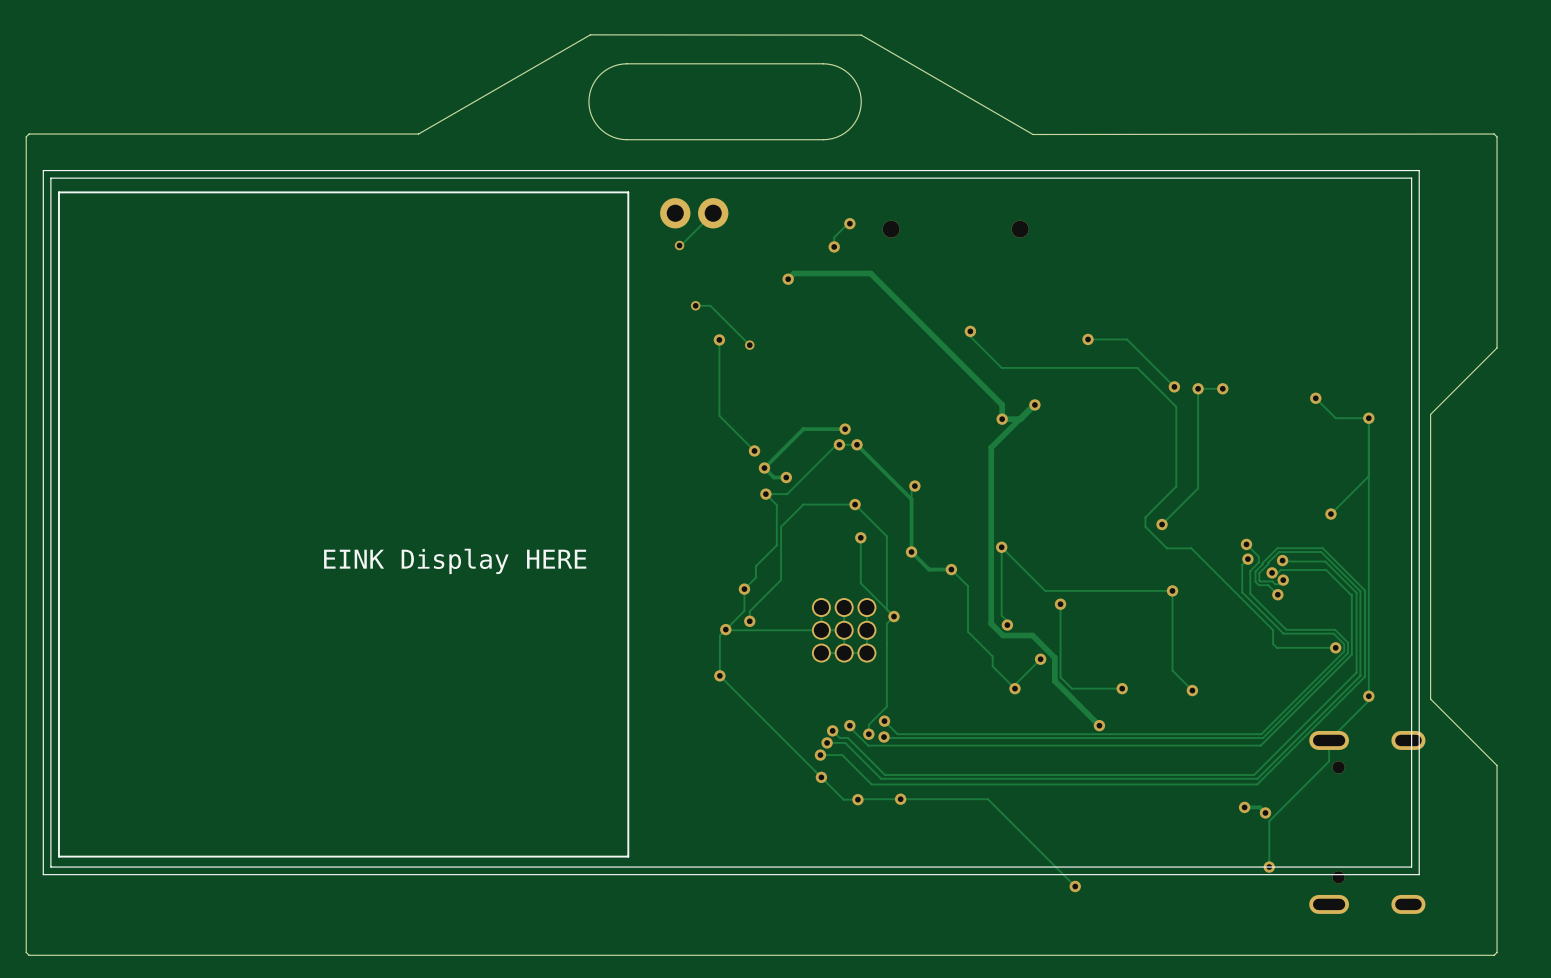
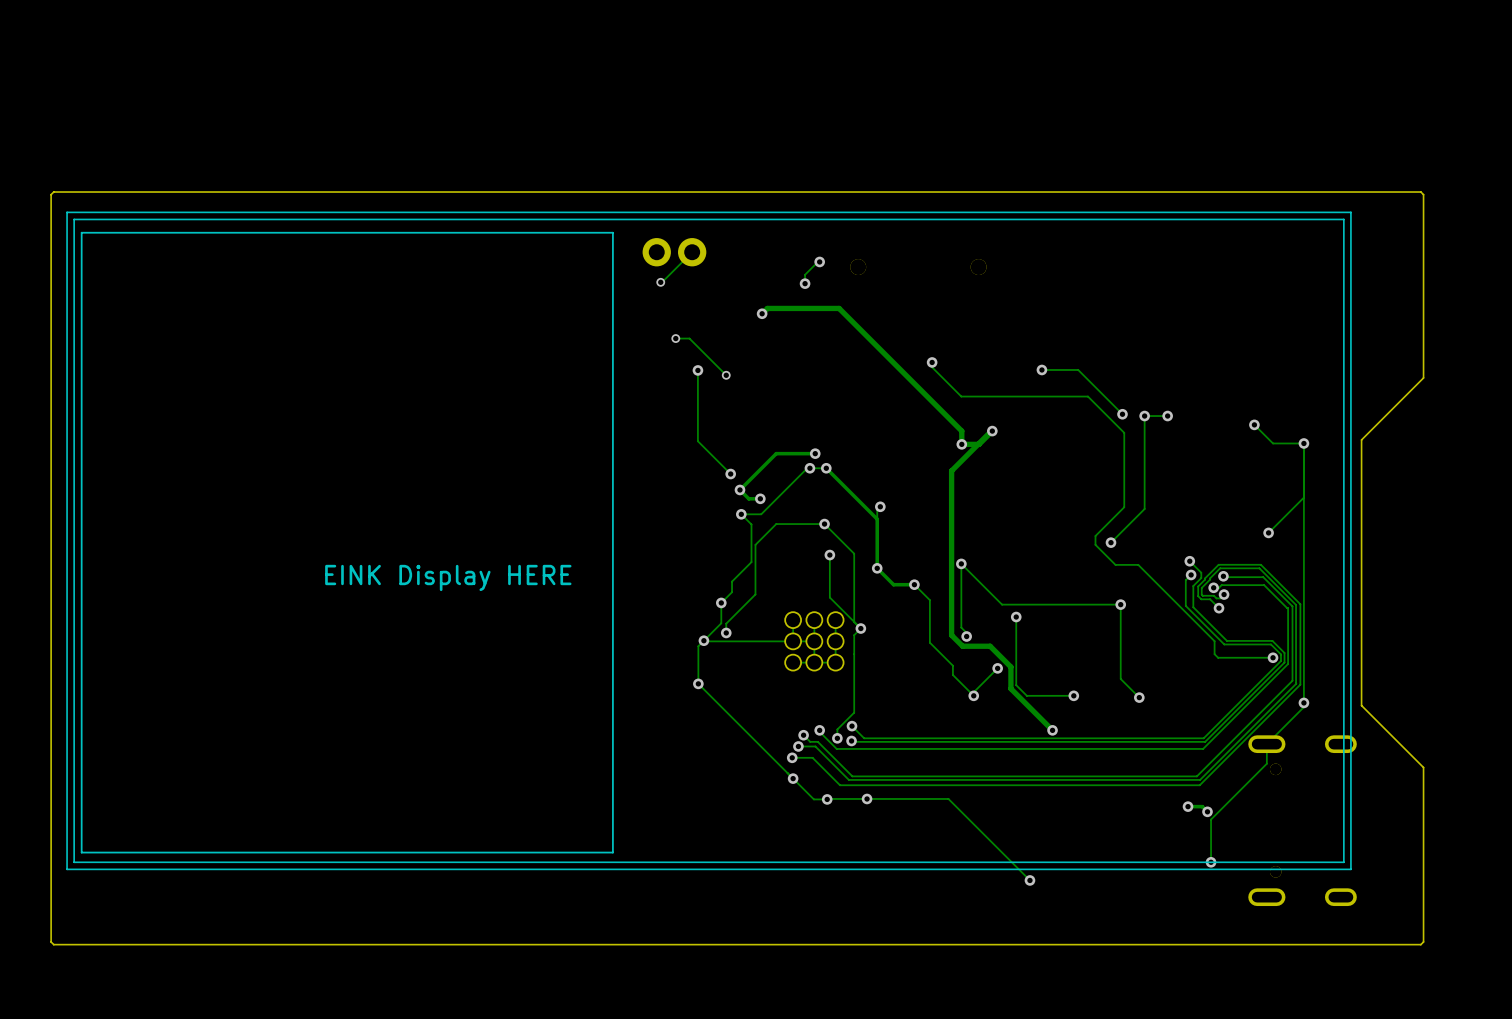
board edge: (823, 63) (617, 64) (601, 73) (593, 84) (589, 97) (590, 110) (593, 119) (601, 130) (613, 137) (622, 139) (832, 138) (844, 132) (854, 123) (860, 110) (860, 97) (856, 84) (848, 73) (836, 66) (823, 63) -> none
board edge: (1497, 151) (1497, 136) (1494, 134) (1033, 134) (861, 35) (590, 34) (418, 134) (29, 134) (26, 136) (26, 151) -> (1423, 194) (1420, 192) (53, 192) (51, 194)

